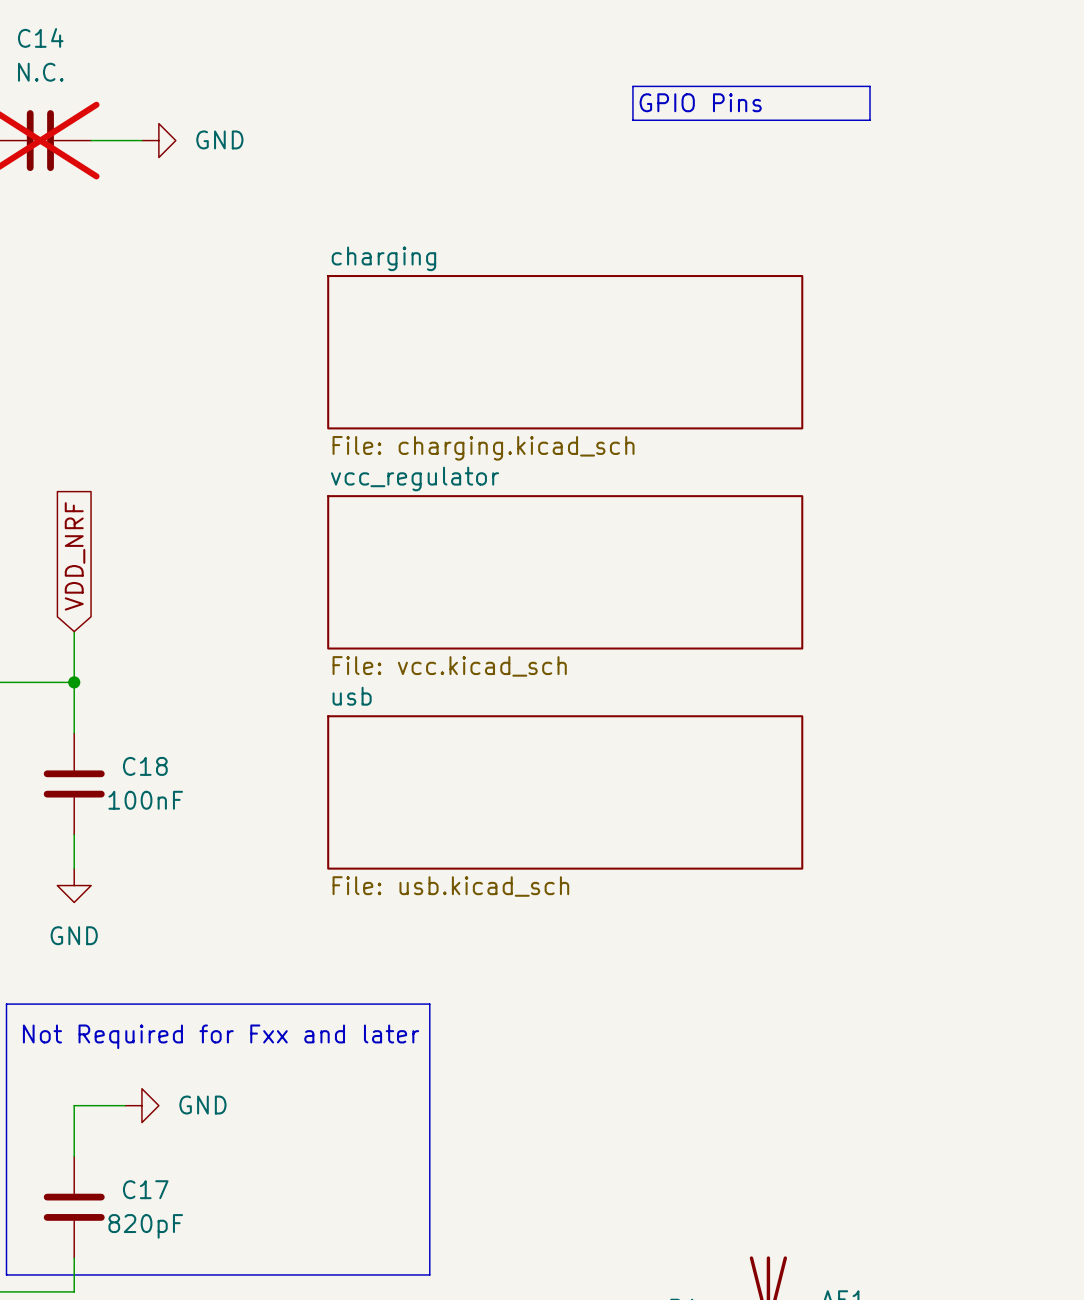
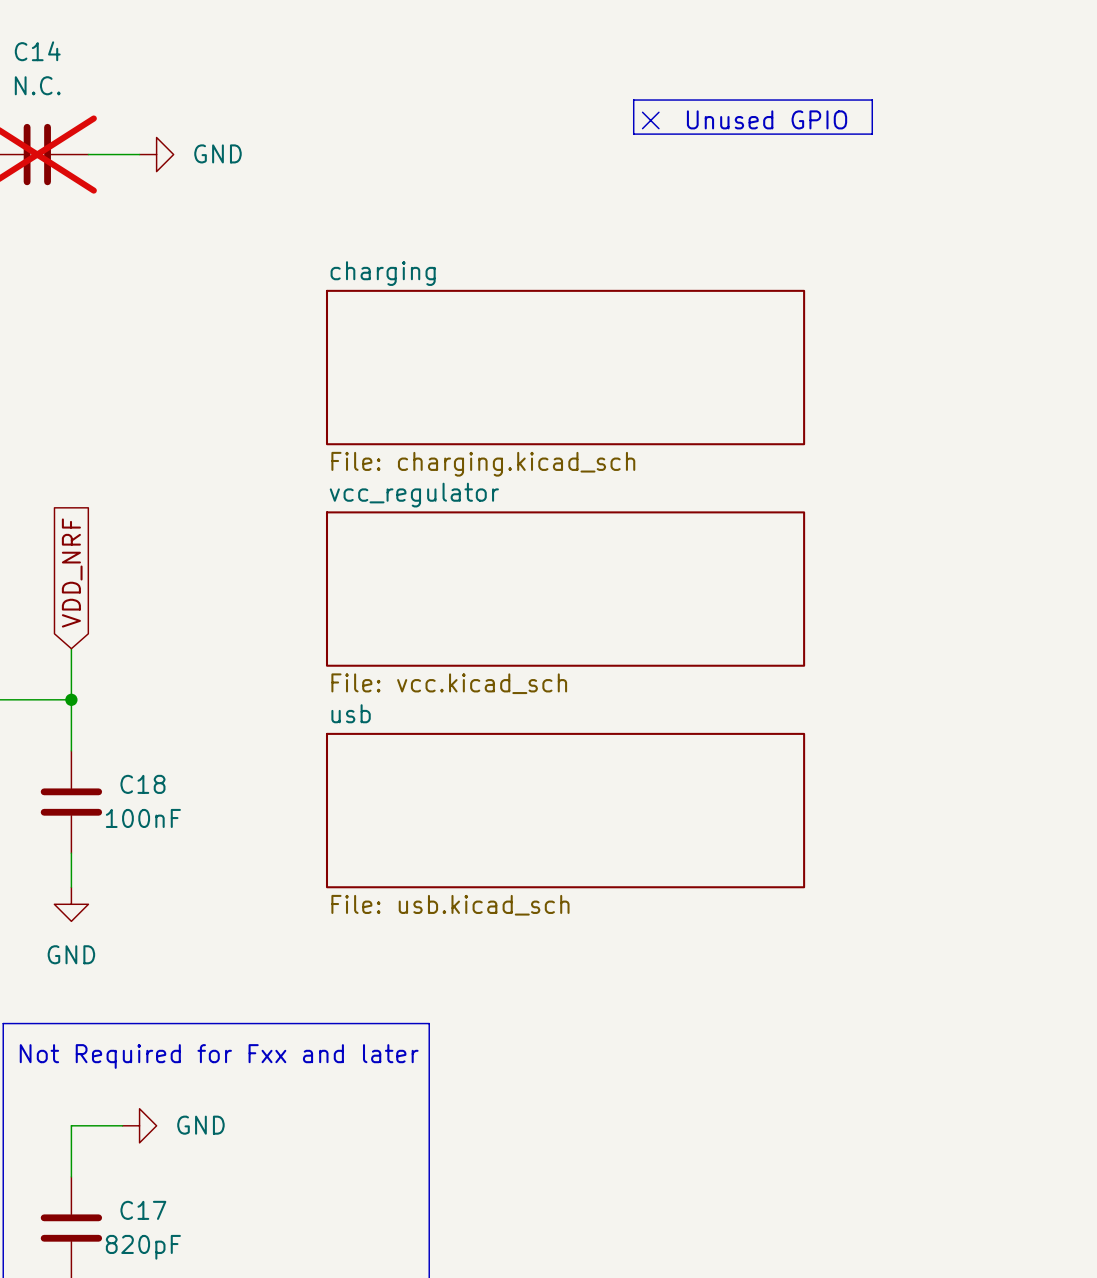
text: GPIO Pins (700, 102) -> none
no-connect mark: none -> (650, 120)
text: none -> Unused GPIO (767, 119)

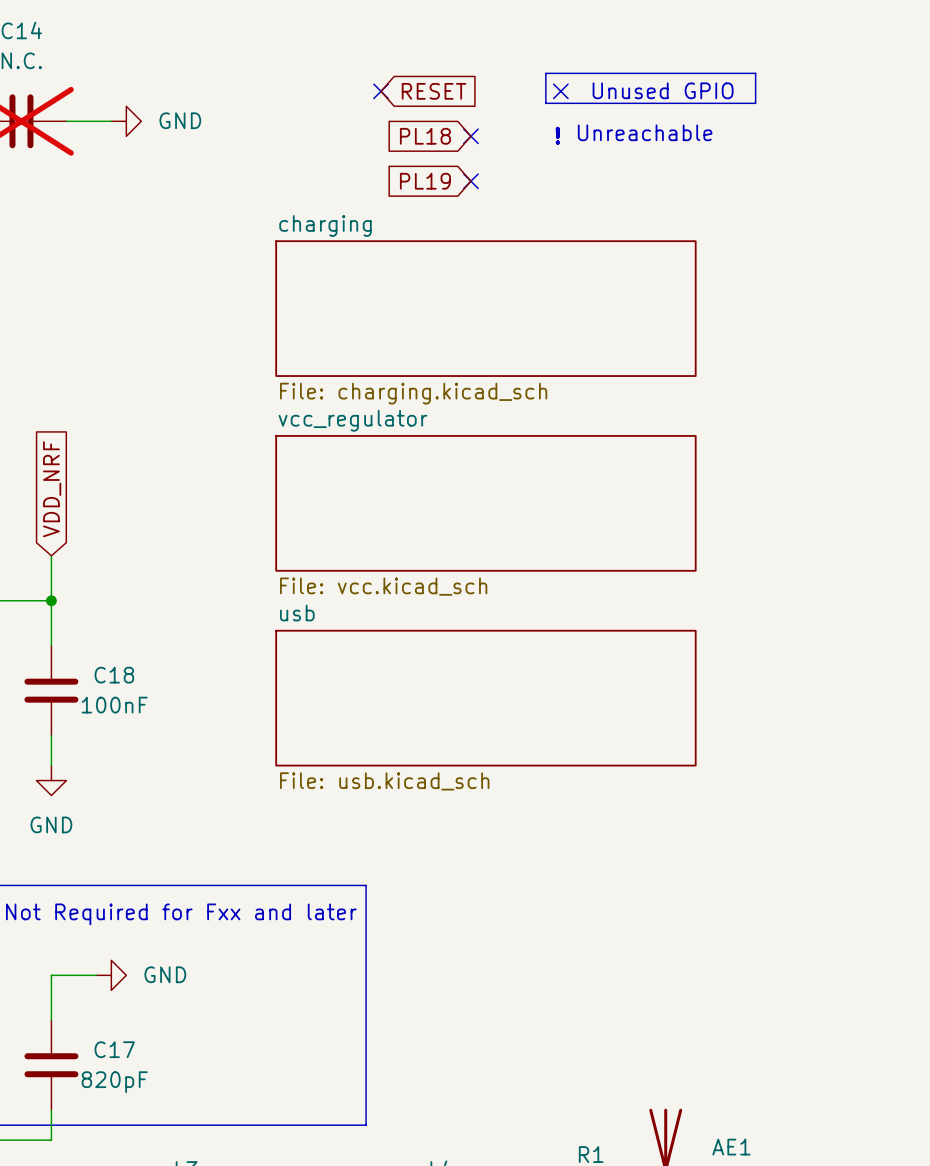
no-connect mark: none -> (381, 91)
global label: none -> RESET (434, 91)
text: none -> Unreachable (645, 132)
global label: none -> PL18 (425, 136)
no-connect mark: none -> (470, 136)
text: none -> ! (557, 135)
global label: none -> PL19 (425, 181)
no-connect mark: none -> (470, 181)

